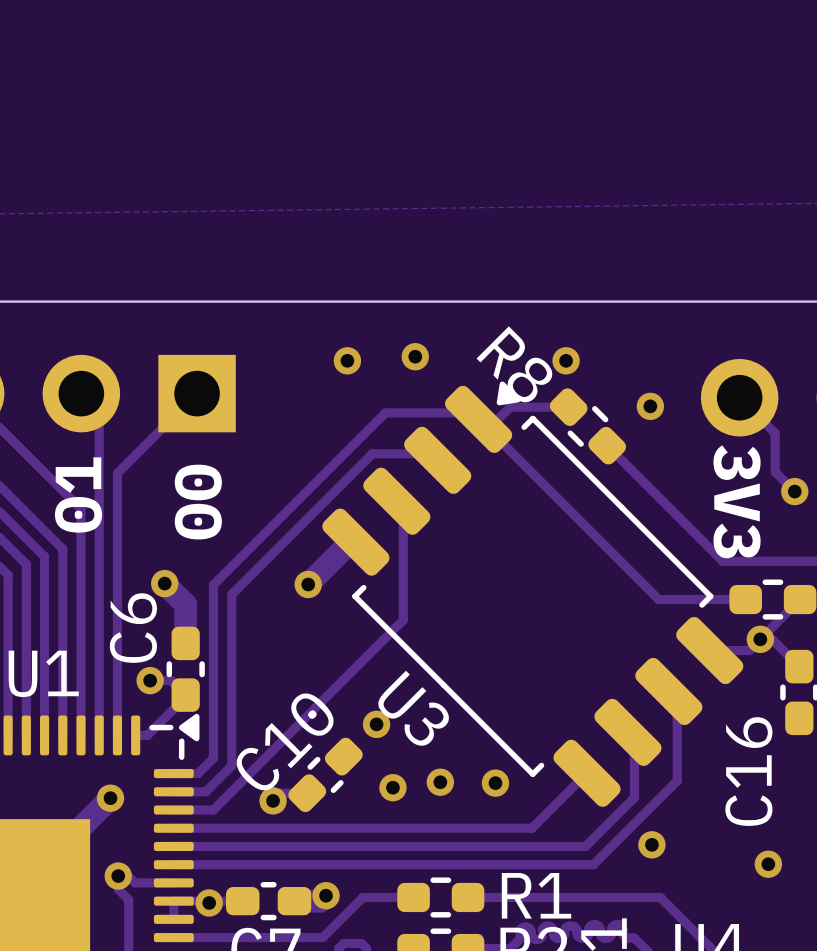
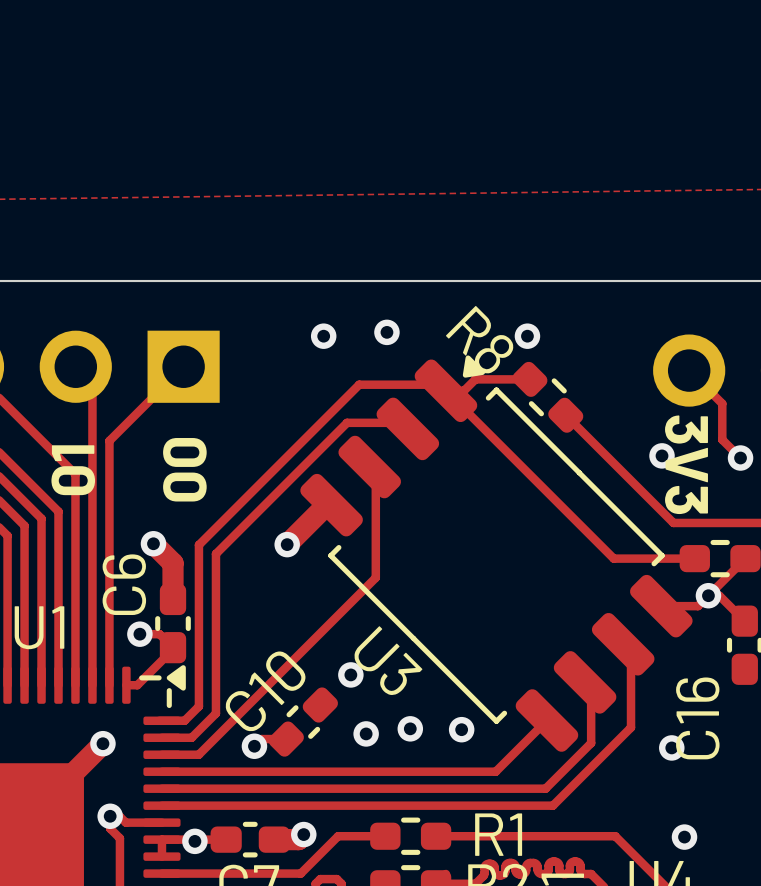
via position: (650, 406) -> (662, 455)
via: none -> (671, 747)
via: (651, 844) -> none
via: (768, 864) -> none
via: none -> (684, 837)

